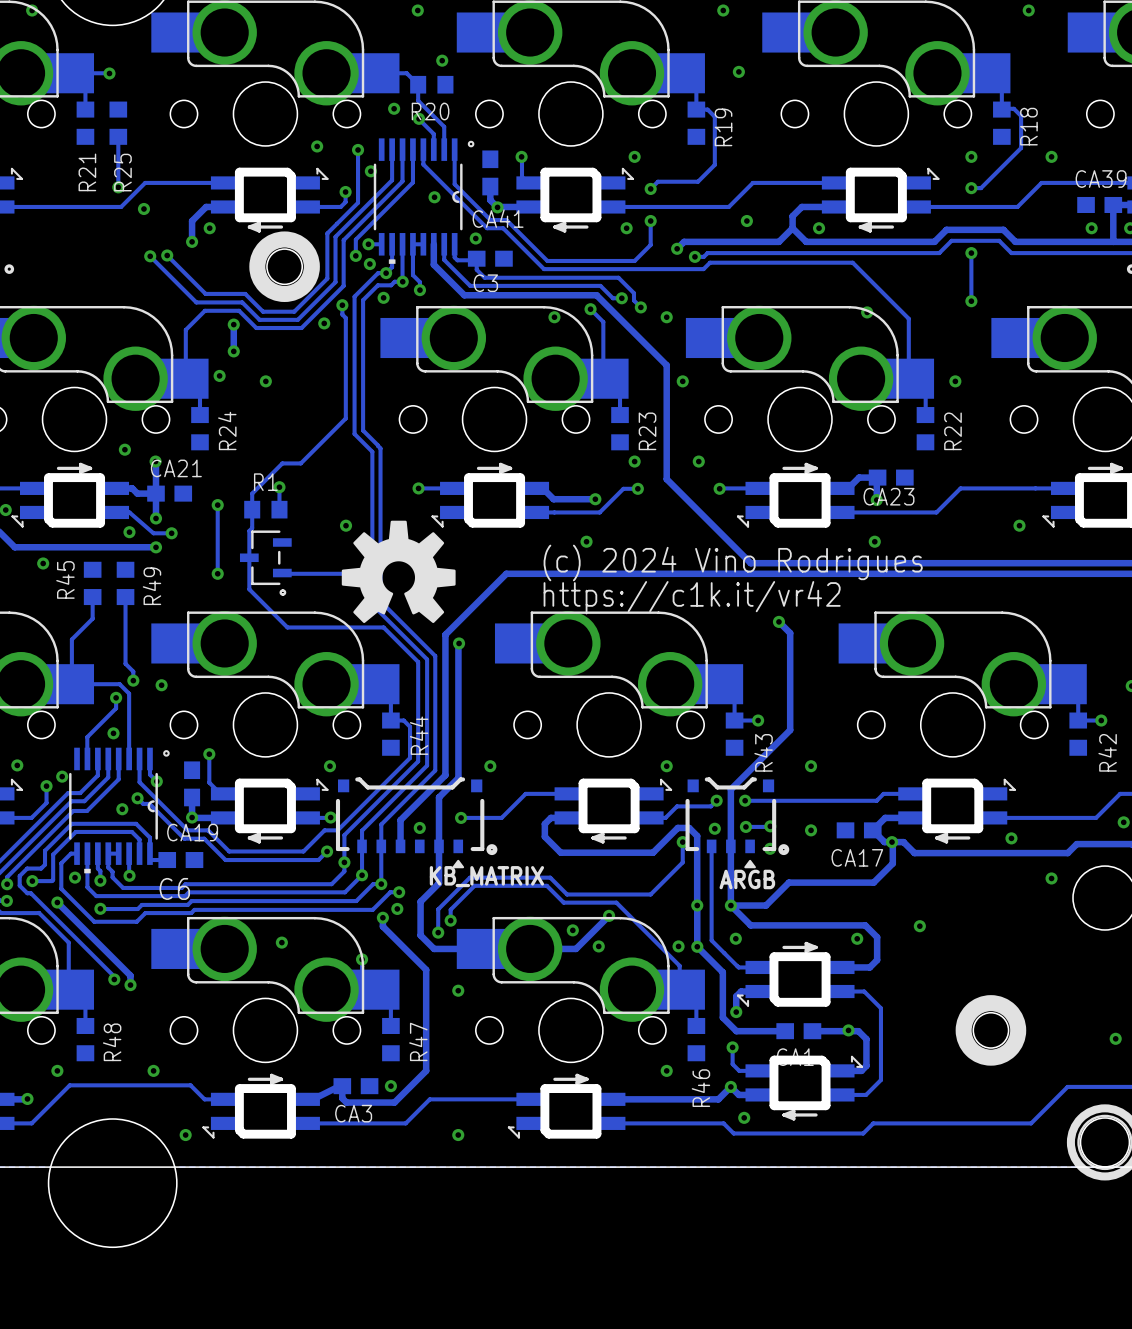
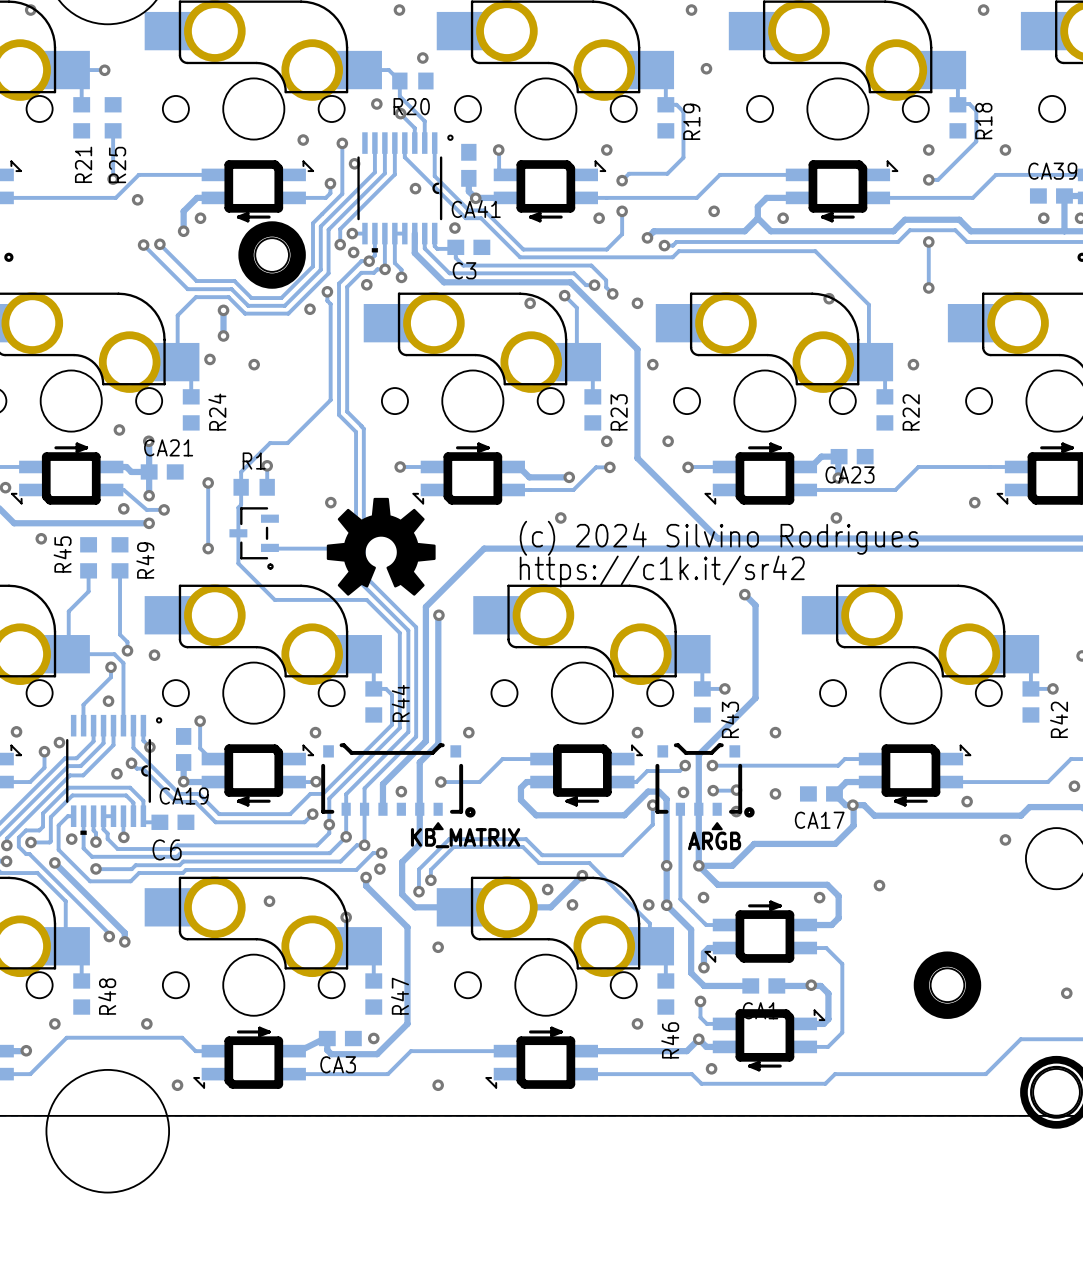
text: (c) 2024 Vino Rodrigues (733, 562) -> (c) 2024 Silvino Rodrigues (719, 538)
text: https://c1k.it/vr42 (692, 597) -> https://c1k.it/sr42 (662, 571)

